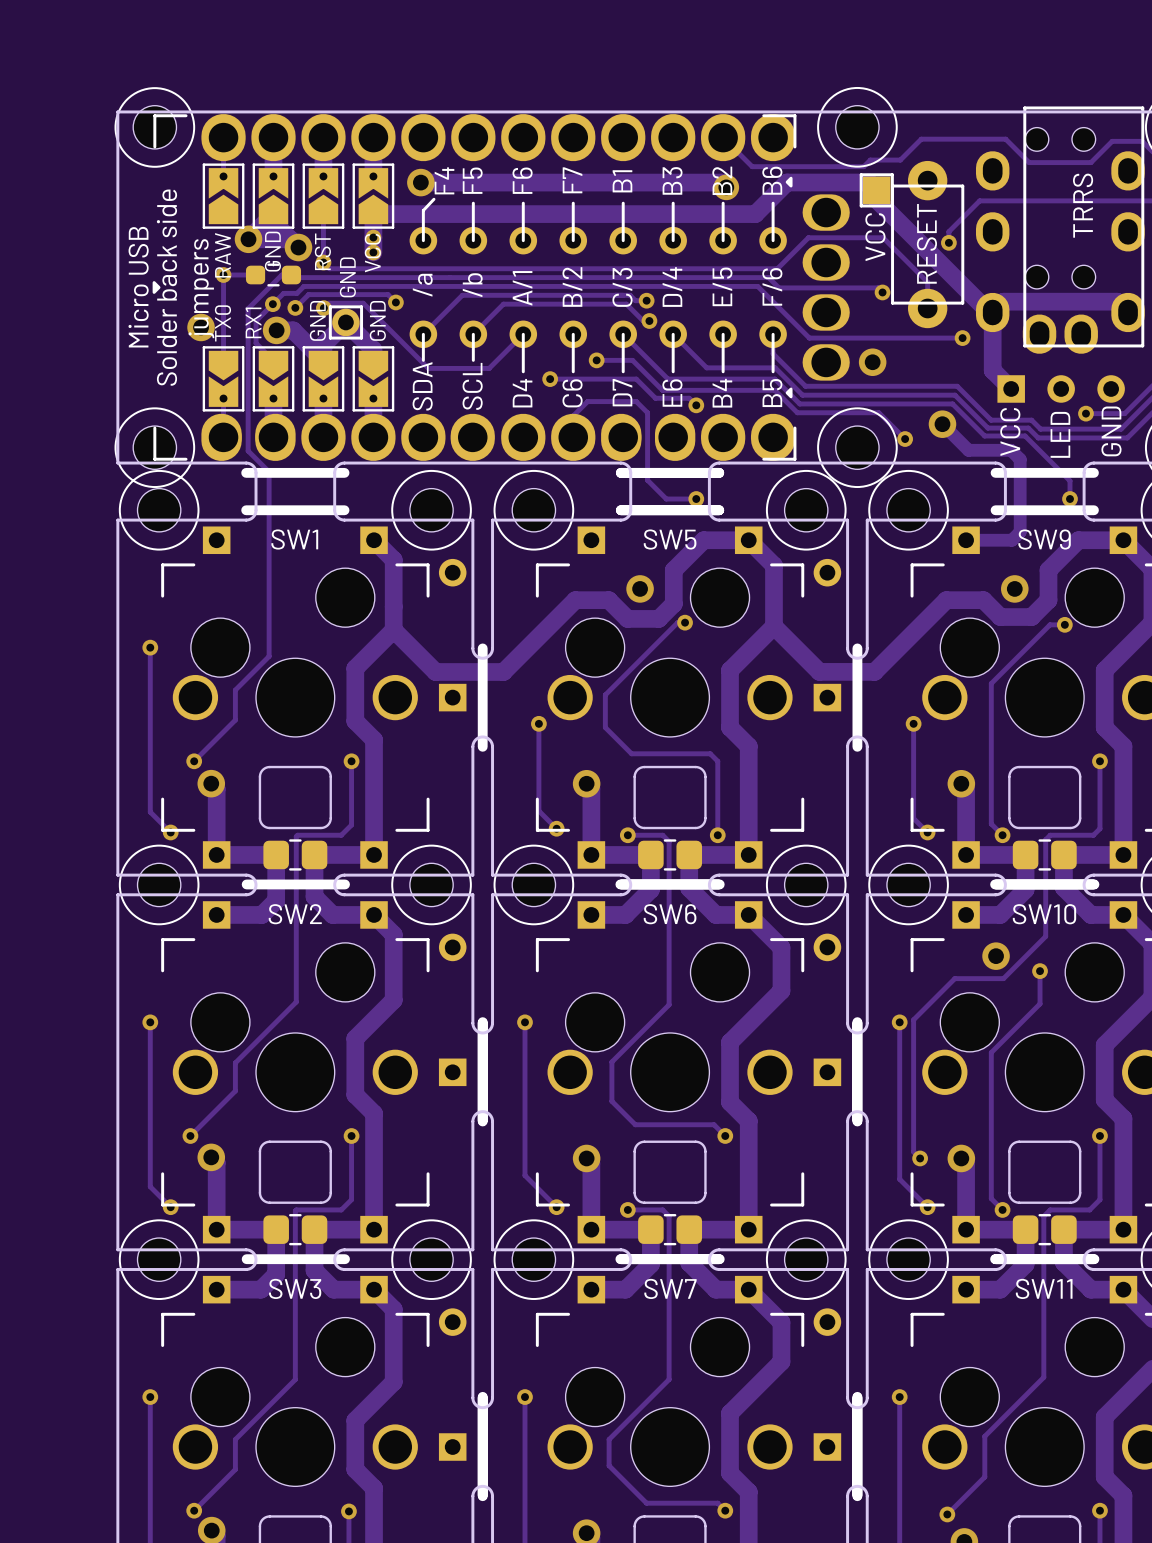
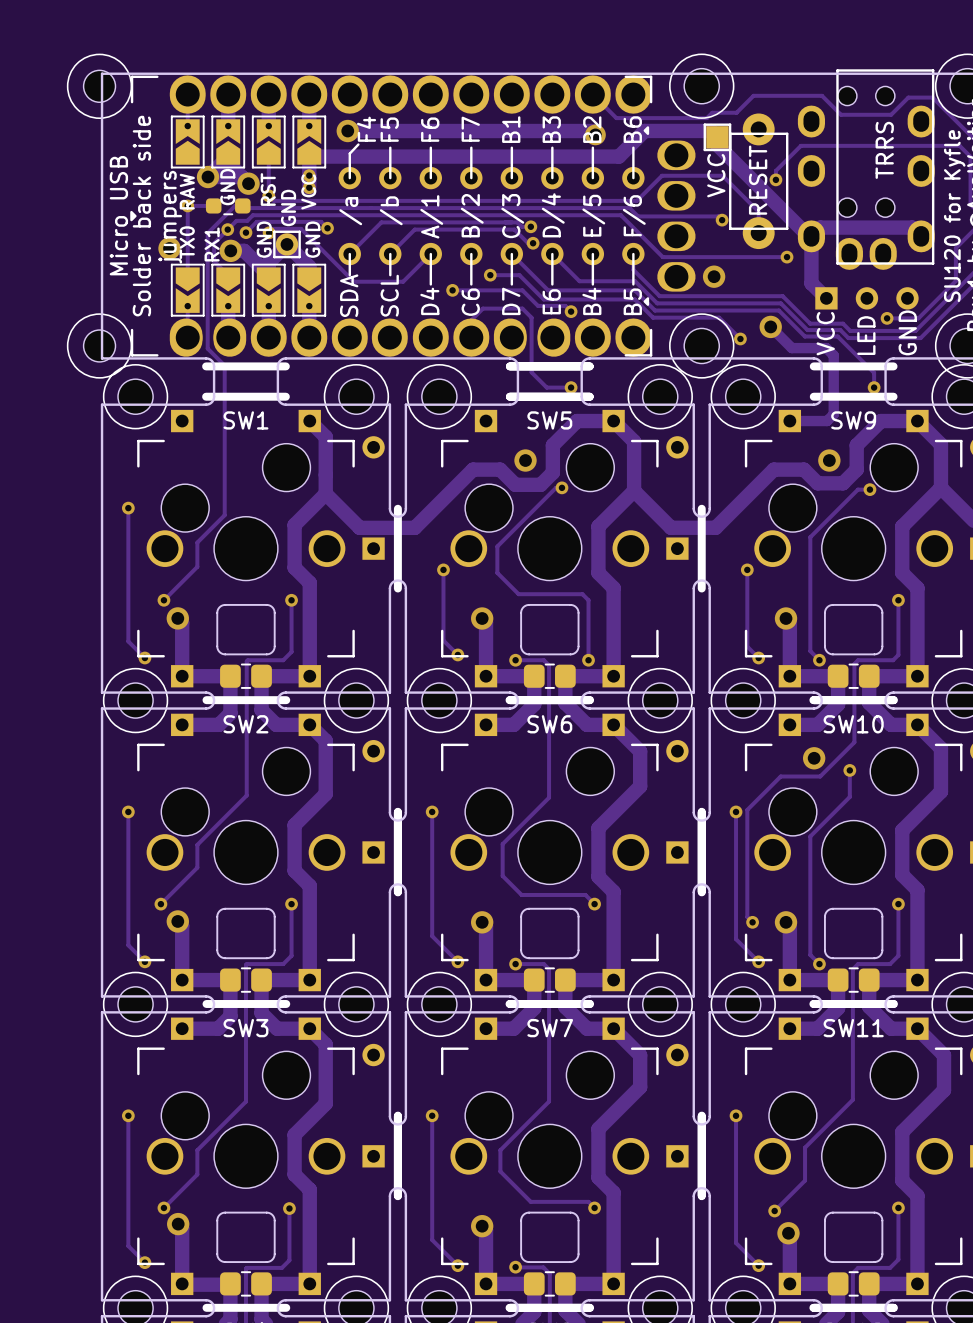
part: none -> (99, 86)
part: (154, 127) -> none
part: none -> (99, 345)
part: (154, 447) -> none

